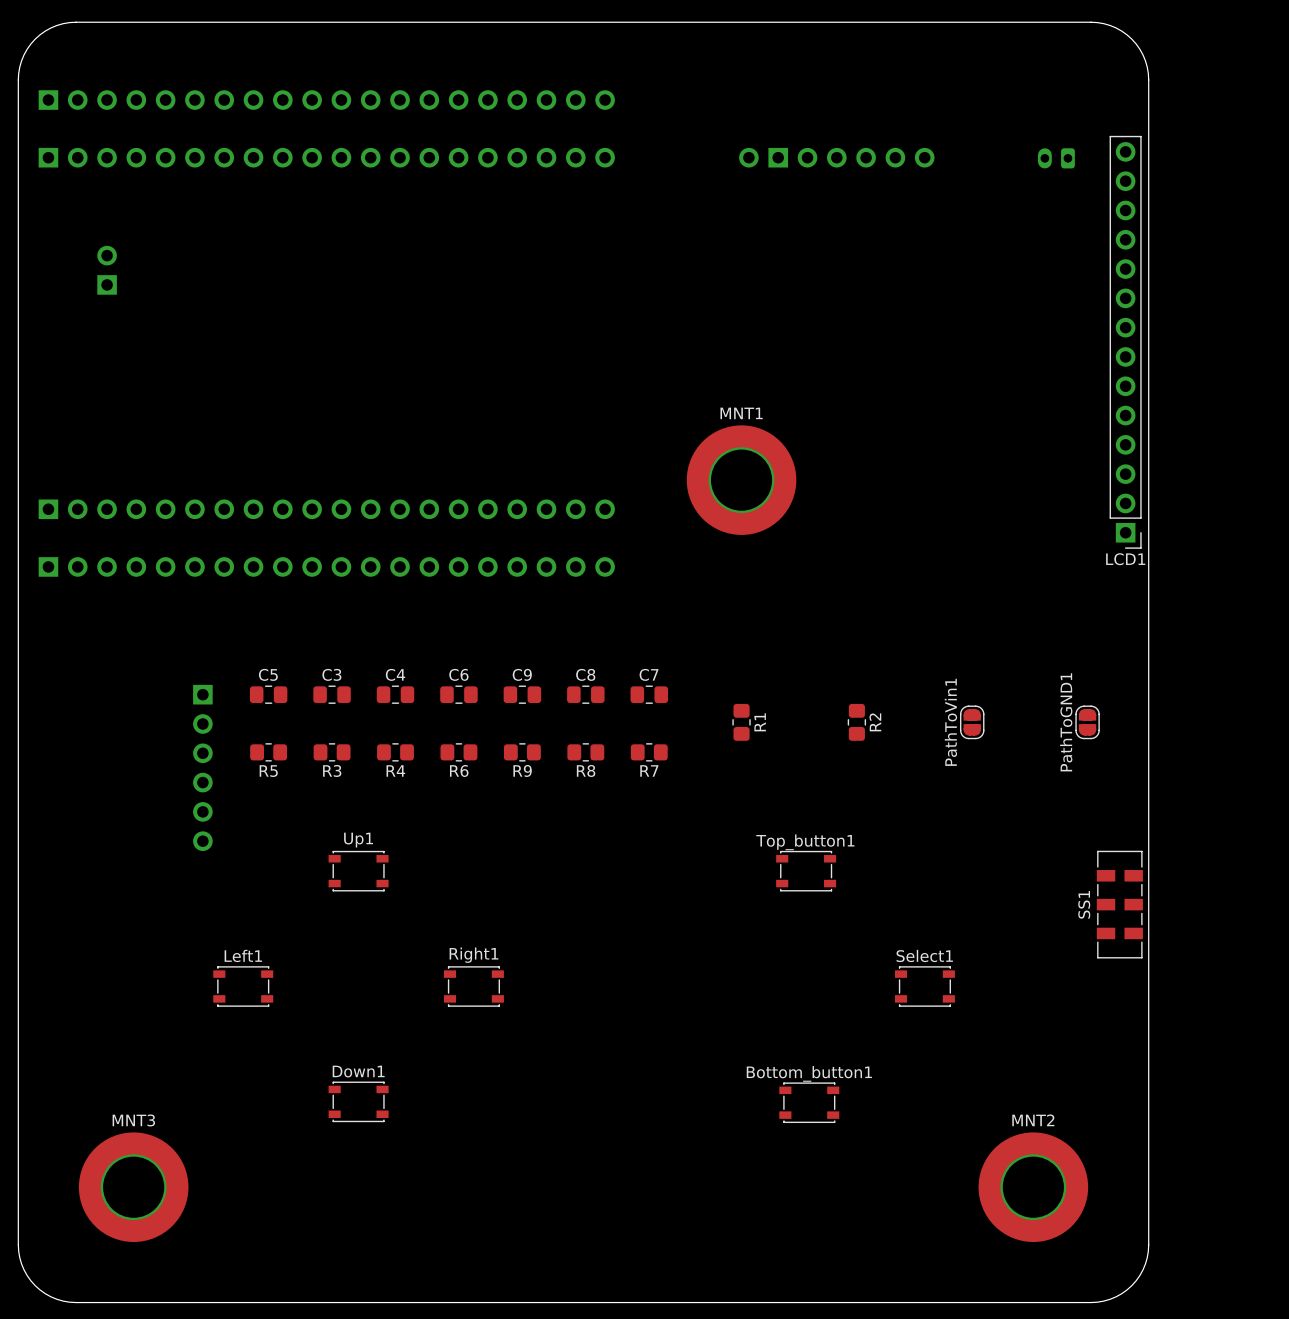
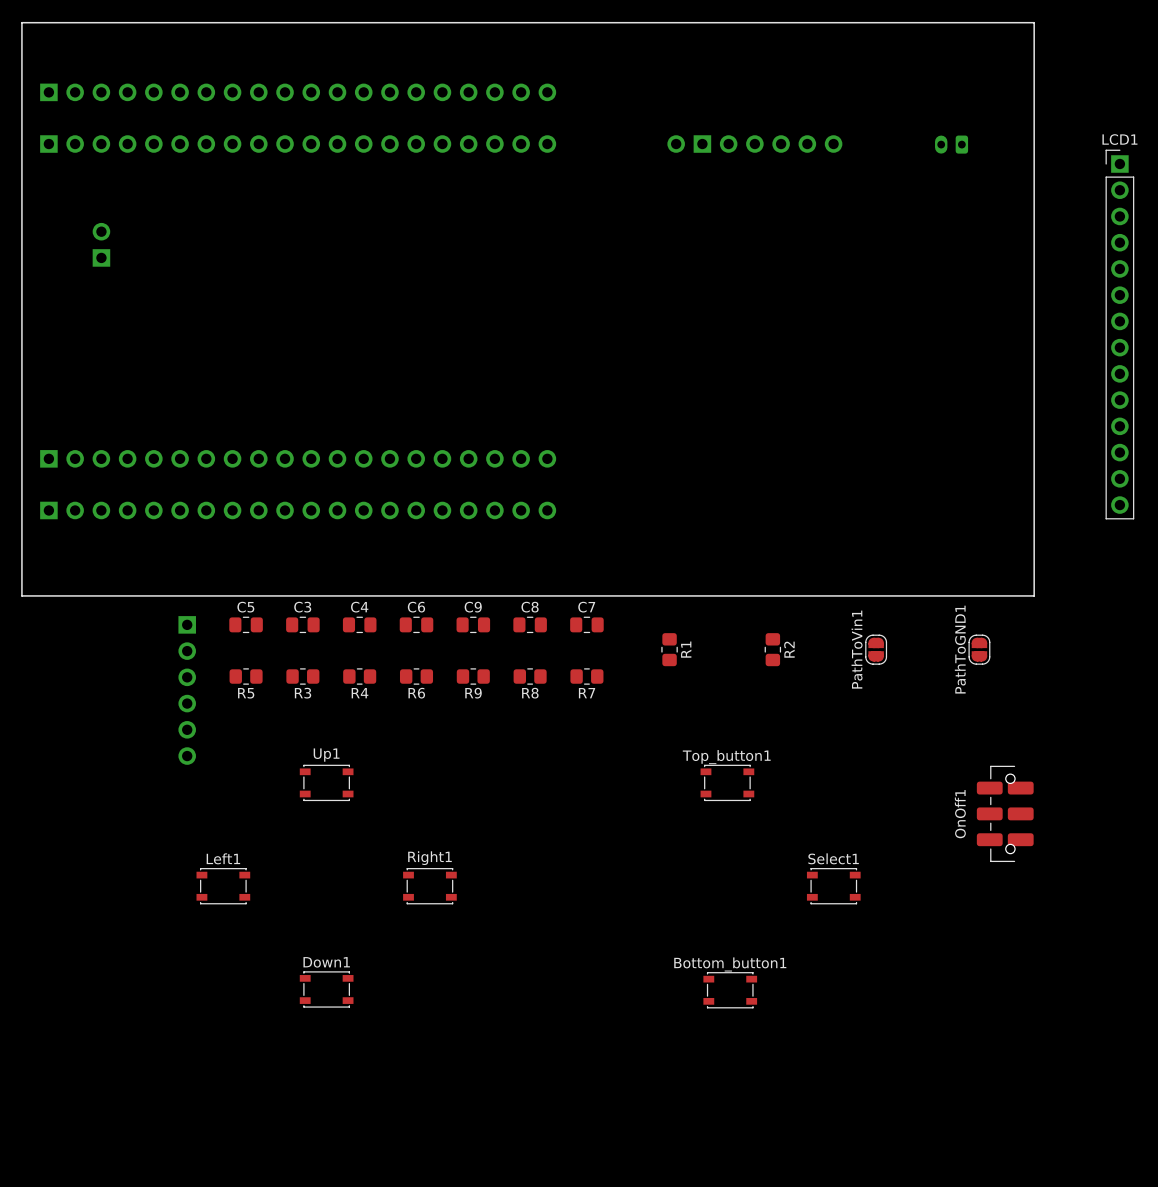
line: none -> (21, 22) (1034, 22) (1034, 595) (21, 595) (21, 22)
board edge: (76, 22) (1091, 22) (1116, 27) (1136, 43) (1145, 60) (1148, 79) (1148, 1244) (1142, 1269) (1126, 1289) (1110, 1299) (1091, 1302) (76, 1302) (50, 1296) (30, 1280) (21, 1263) (18, 1244) (18, 79) (24, 54) (35, 39) (50, 27) (76, 22) -> none
LCD1 rotation: 0° (1125, 342) -> 180° (1119, 334)
MNT1: (741, 480) -> none
SS1: (1119, 904) -> none
OnOff1: none -> (1005, 813)
MNT3: (133, 1187) -> none
MNT2: (1033, 1187) -> none

